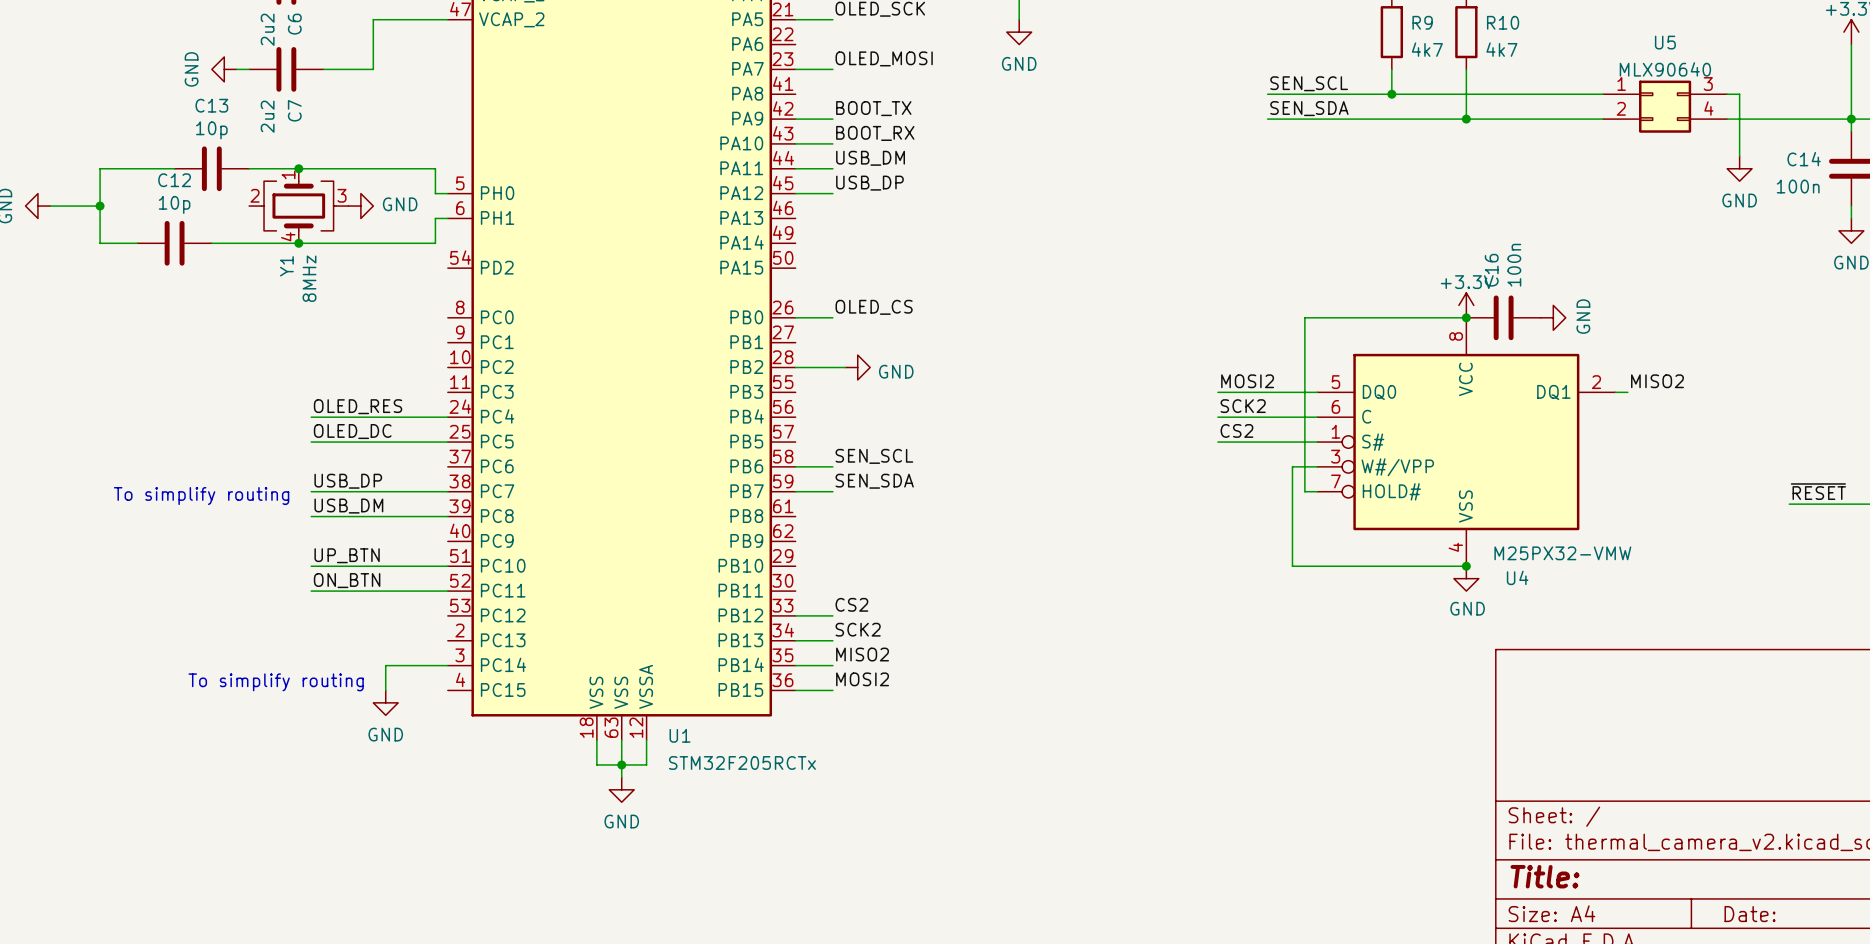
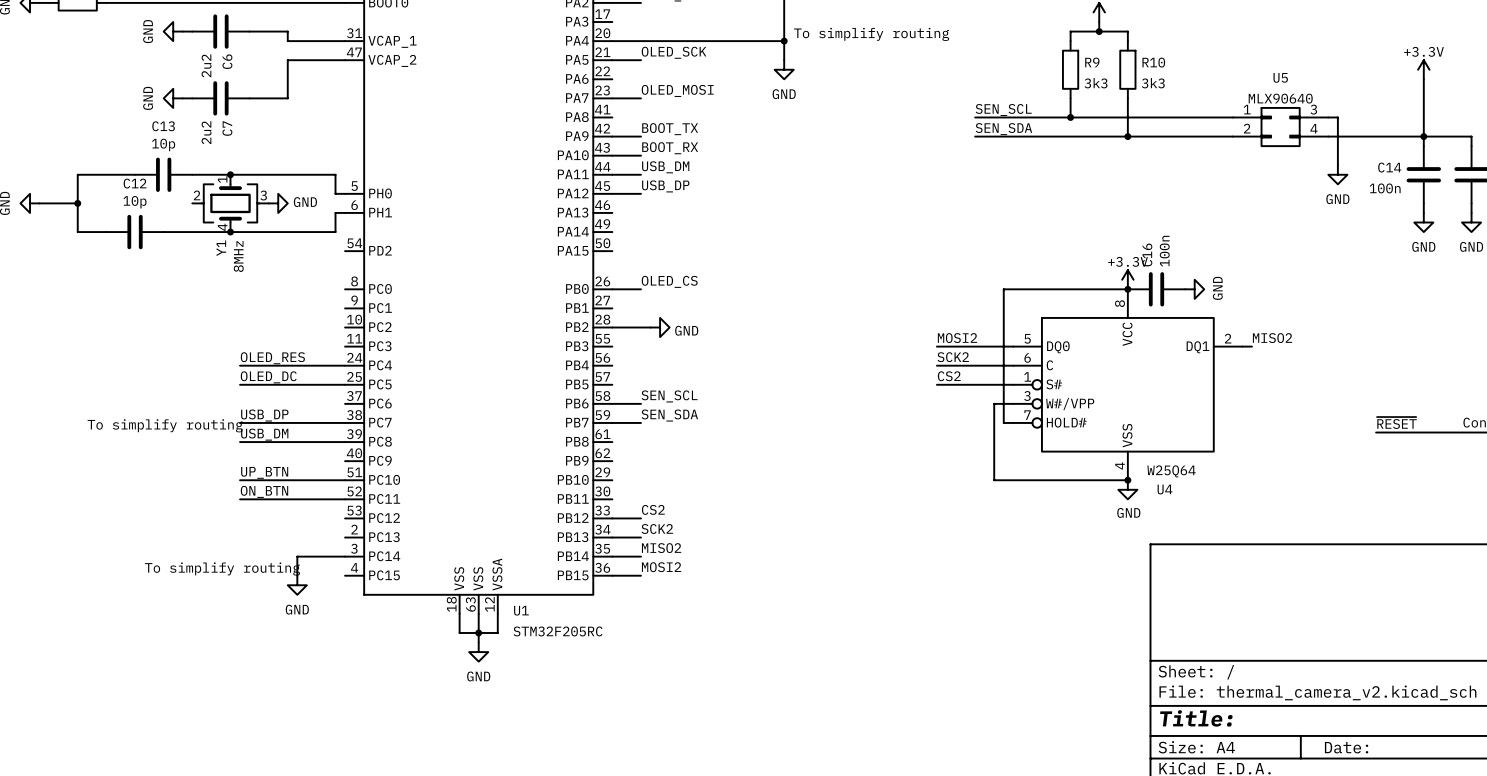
R9 value: 4k7 (1427, 49) -> 3k3 (1096, 83)
R10 value: 4k7 (1501, 49) -> 3k3 (1153, 83)
U4 value: M25PX32-VMW (1562, 553) -> W25Q64 (1171, 471)
U1 value: STM32F205RCTx (742, 762) -> STM32F205RC (558, 631)

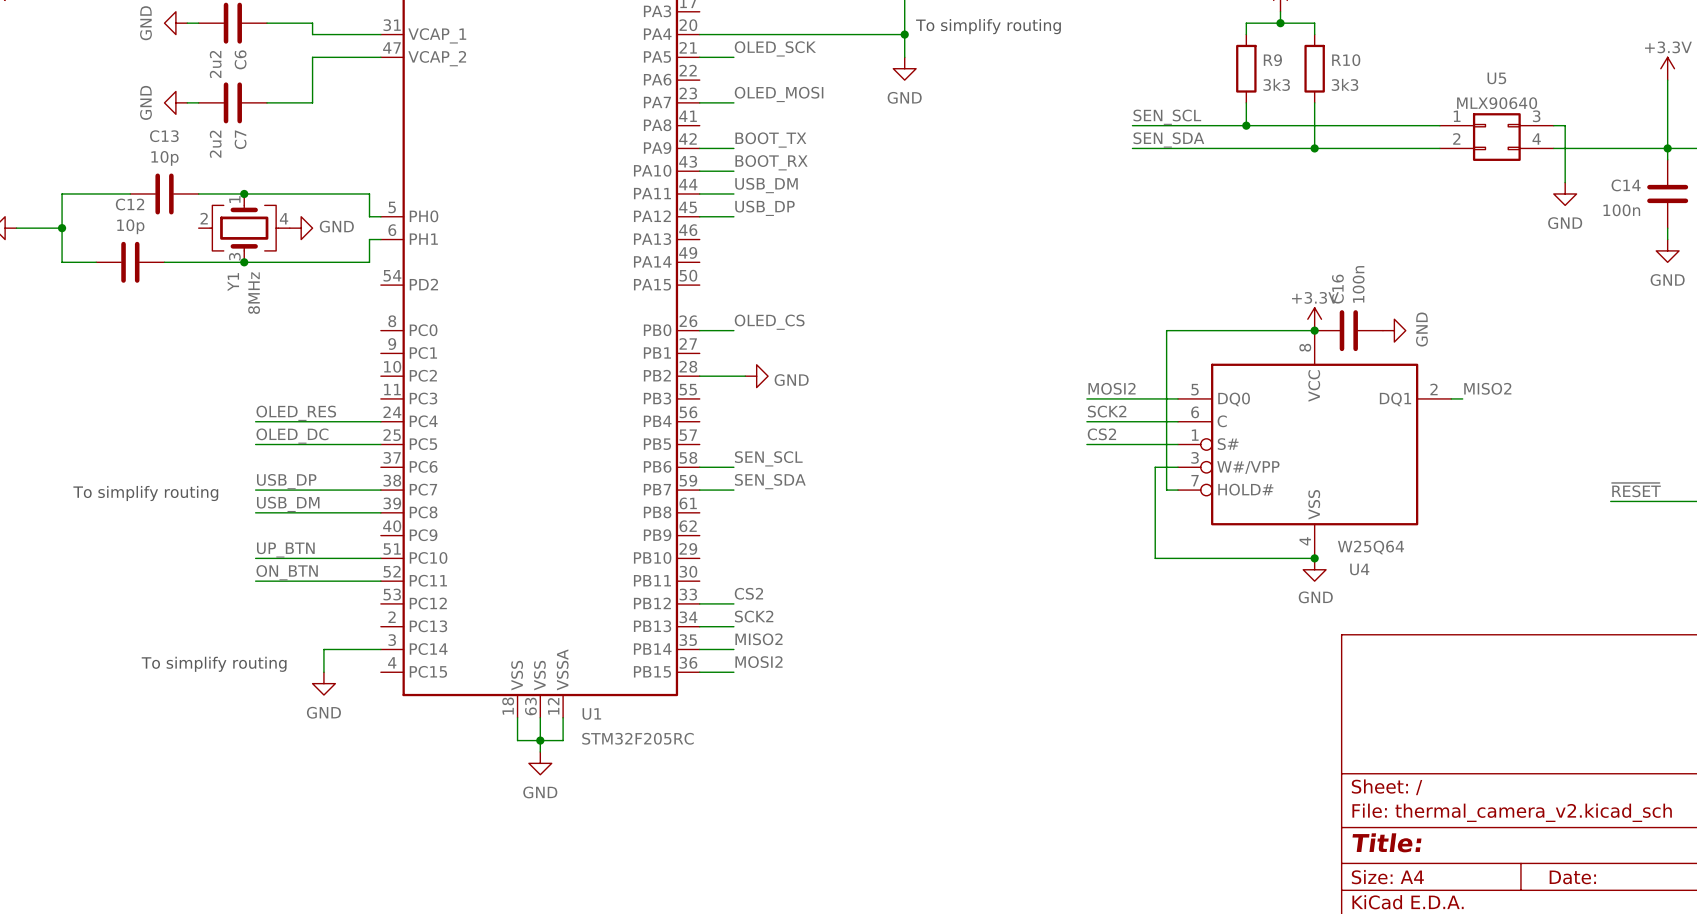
Y1 pin number: 3 (263, 195) -> 4 (284, 218)
Y1 pin number: 4 (222, 227) -> 3 (234, 256)

